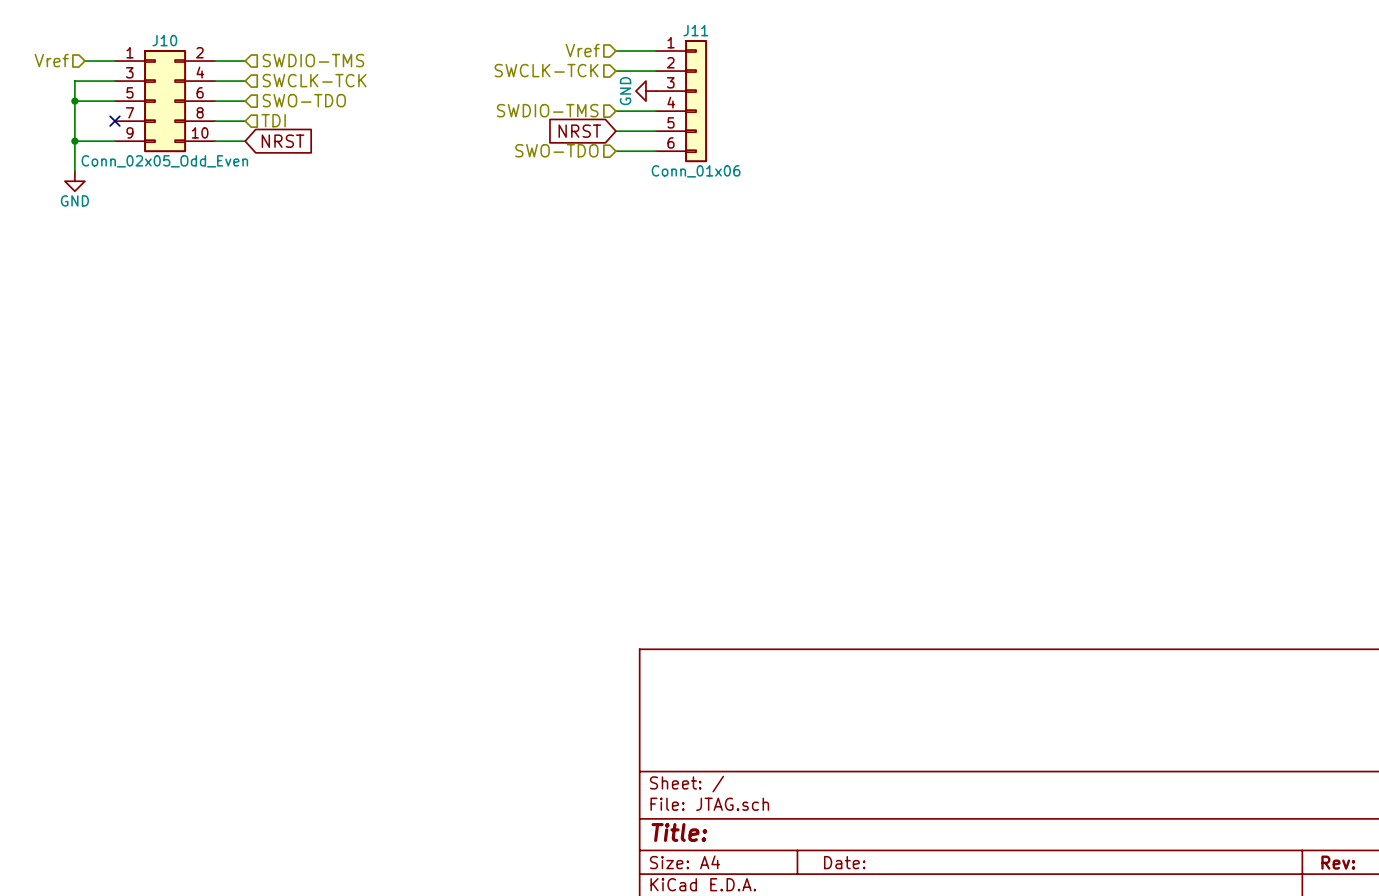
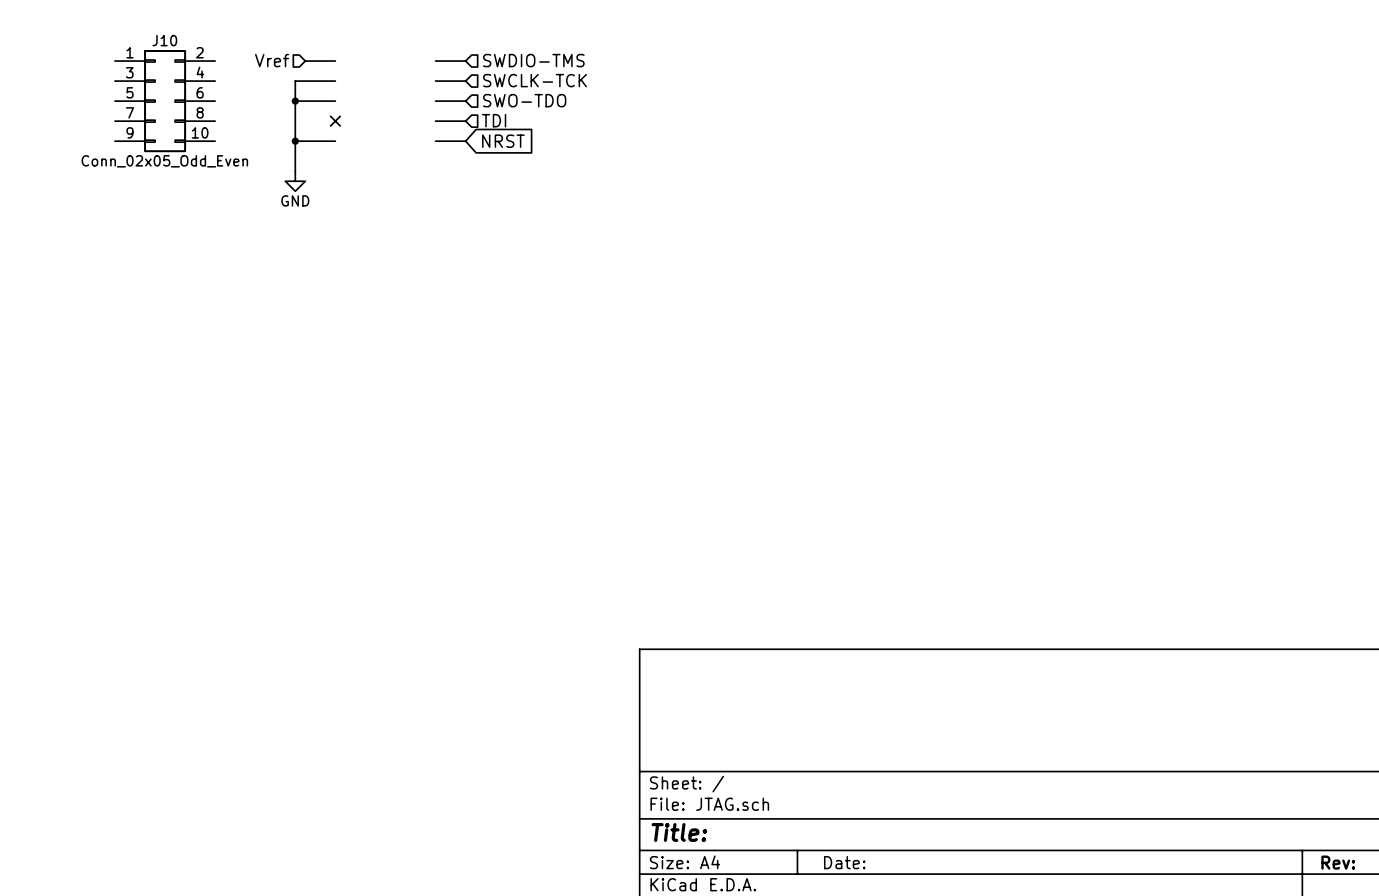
hierarchical label: Vref (582, 50) -> none
wire: (615, 51) (655, 51) -> none
hierarchical label: Vref (51, 60) -> none
hierarchical label: none -> Vref (272, 60)
hierarchical label: SWDIO-TMS (313, 60) -> none
hierarchical label: none -> SWDIO-TMS (533, 60)
wire: (84, 61) (114, 61) -> none
wire: (215, 61) (245, 61) -> (305, 61) (335, 61)
wire: none -> (435, 61) (465, 61)
hierarchical label rotation: 0° (546, 70) -> 180° (534, 80)
wire: (615, 71) (655, 71) -> none
hierarchical label: SWCLK-TCK (314, 80) -> none
wire: (114, 81) (74, 81) (74, 171) -> none
wire: (215, 81) (245, 81) -> none
wire: none -> (335, 81) (295, 81) (295, 171)
wire: none -> (435, 81) (465, 81)
power symbol: GND (645, 91) -> none
hierarchical label: SWO-TDO (304, 100) -> none
wire: (74, 101) (114, 101) -> none
junction: (74, 101) -> none
wire: (215, 101) (245, 101) -> none
wire: none -> (295, 101) (335, 101)
junction: none -> (295, 101)
wire: none -> (435, 101) (465, 101)
J11: Conn_01x06 (681, 101) -> none
hierarchical label: SWDIO-TMS (547, 110) -> SWO-TDO (524, 100)
wire: (615, 111) (655, 111) -> none
hierarchical label: TDI (273, 120) -> none
hierarchical label: none -> TDI (494, 120)
no-connect mark: (114, 121) -> none
wire: (215, 121) (245, 121) -> none
no-connect mark: none -> (335, 121)
wire: none -> (435, 121) (465, 121)
global label rotation: 0° (579, 131) -> 180° (503, 141)
wire: (615, 131) (655, 131) -> none
wire: (74, 141) (114, 141) -> none
junction: (74, 141) -> none
wire: (215, 141) (245, 141) -> none
global label: NRST (283, 141) -> none
wire: none -> (295, 141) (335, 141)
junction: none -> (295, 141)
wire: none -> (435, 141) (465, 141)
hierarchical label: SWO-TDO (556, 150) -> none
wire: (615, 151) (655, 151) -> none
power symbol: GND (74, 181) -> none
power symbol: none -> GND (295, 181)

